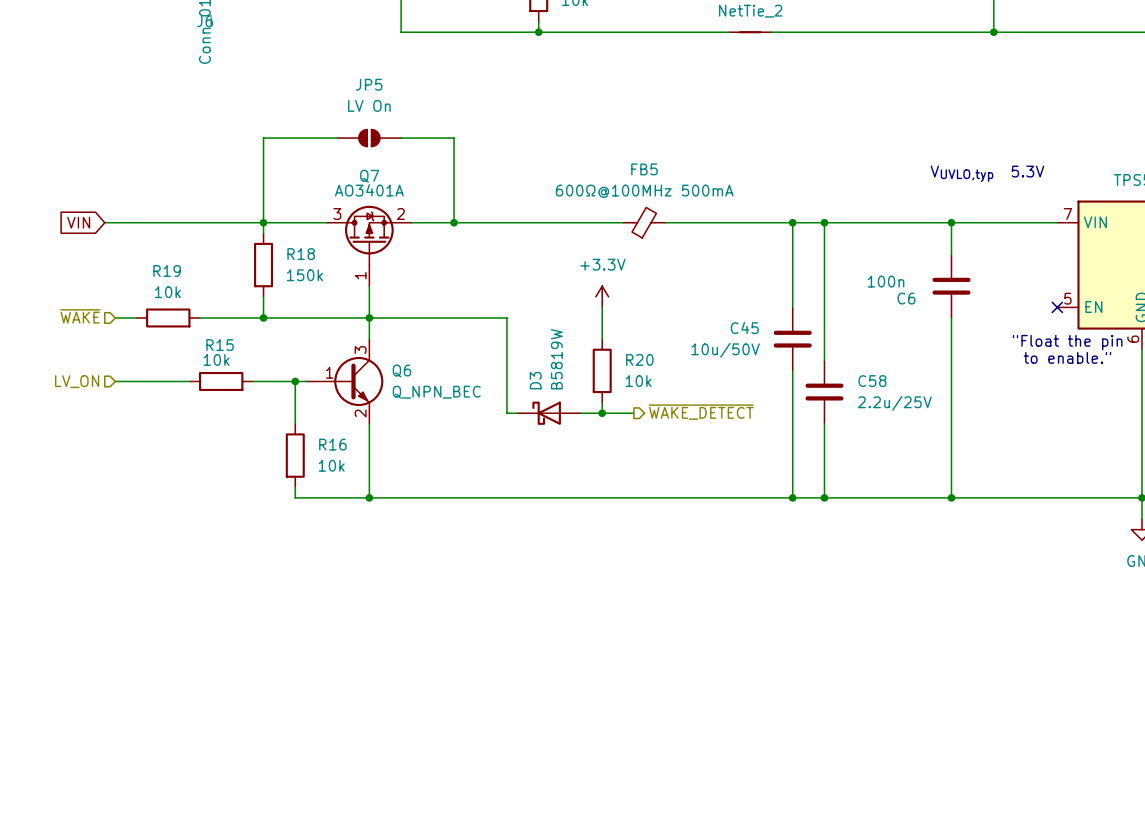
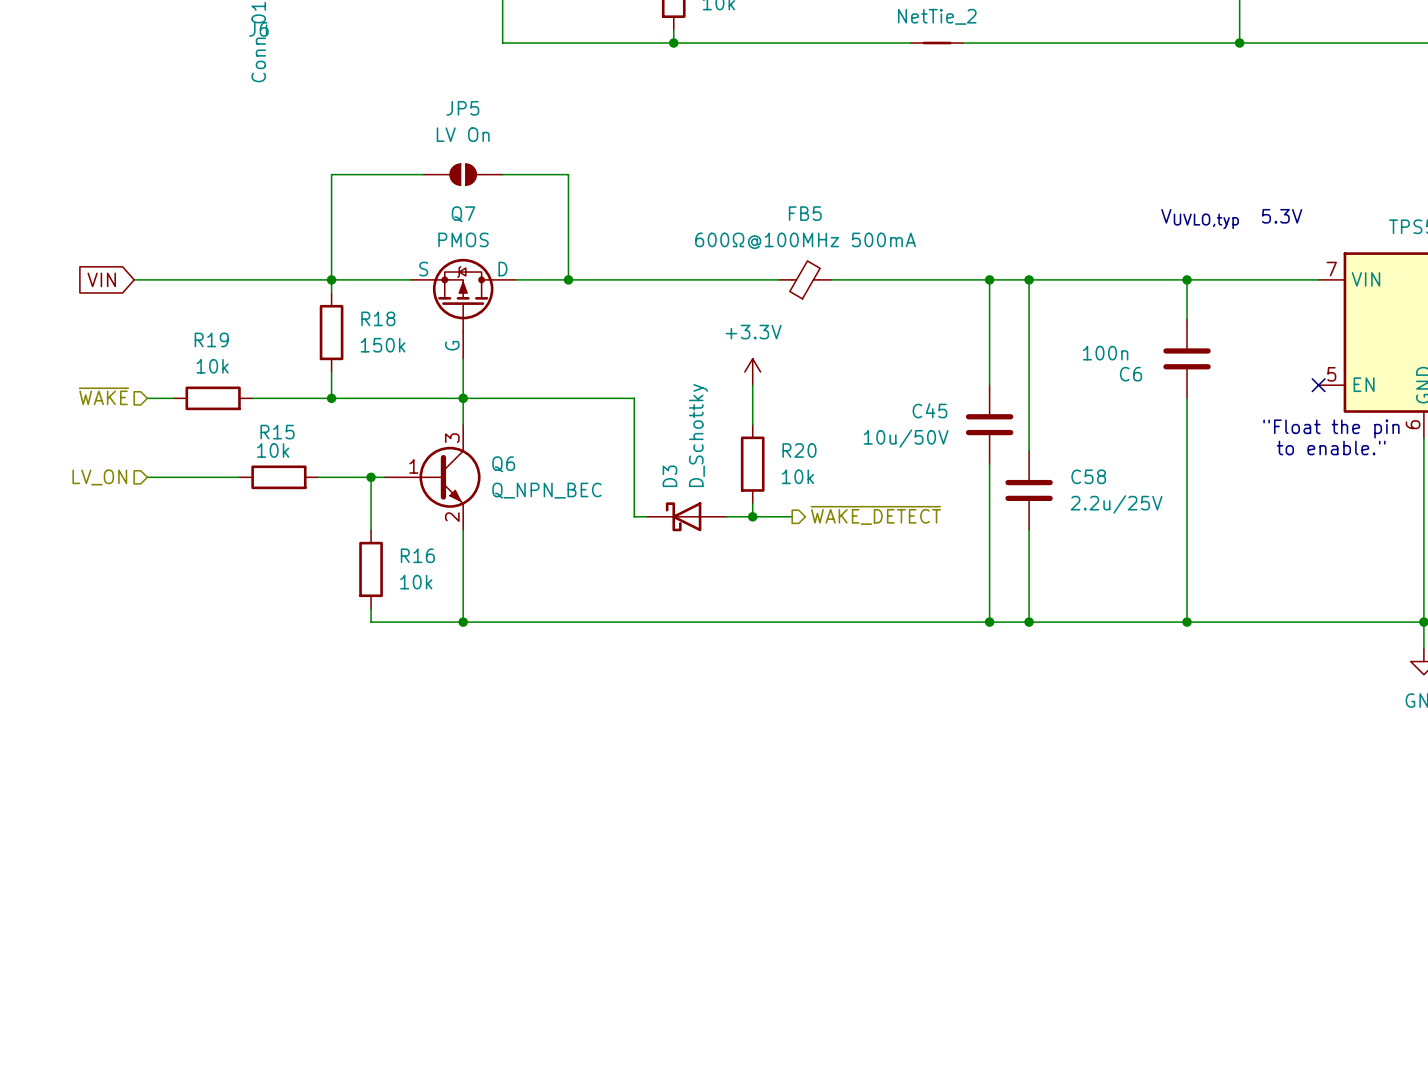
Q7 value: AO3401A (369, 190) -> PMOS (463, 239)
Q7 symbol: [327, 205, 412, 287] -> [410, 258, 516, 359]
D3 value: B5819W (556, 359) -> D_Schottky (698, 435)

